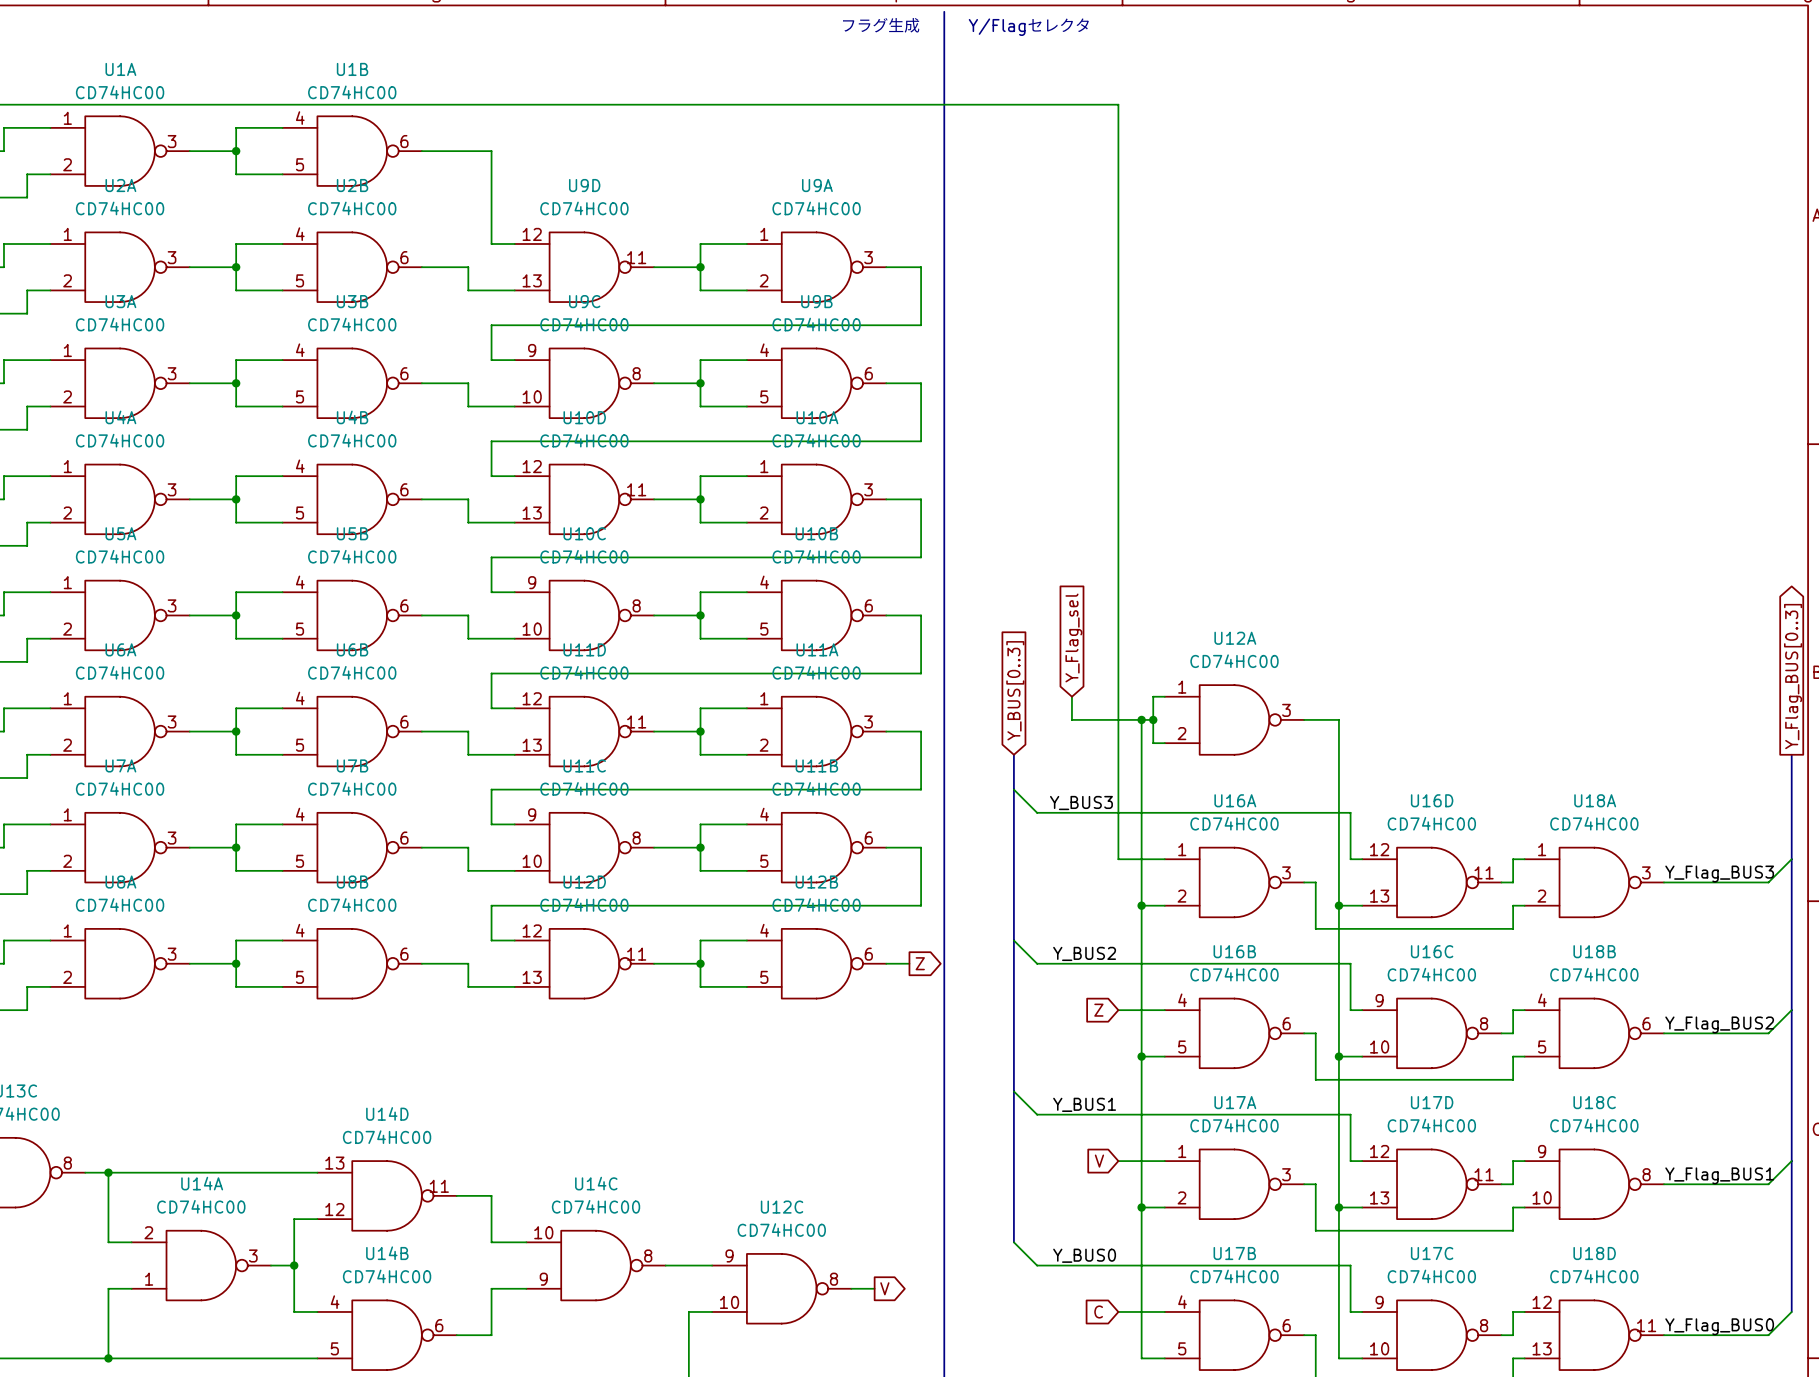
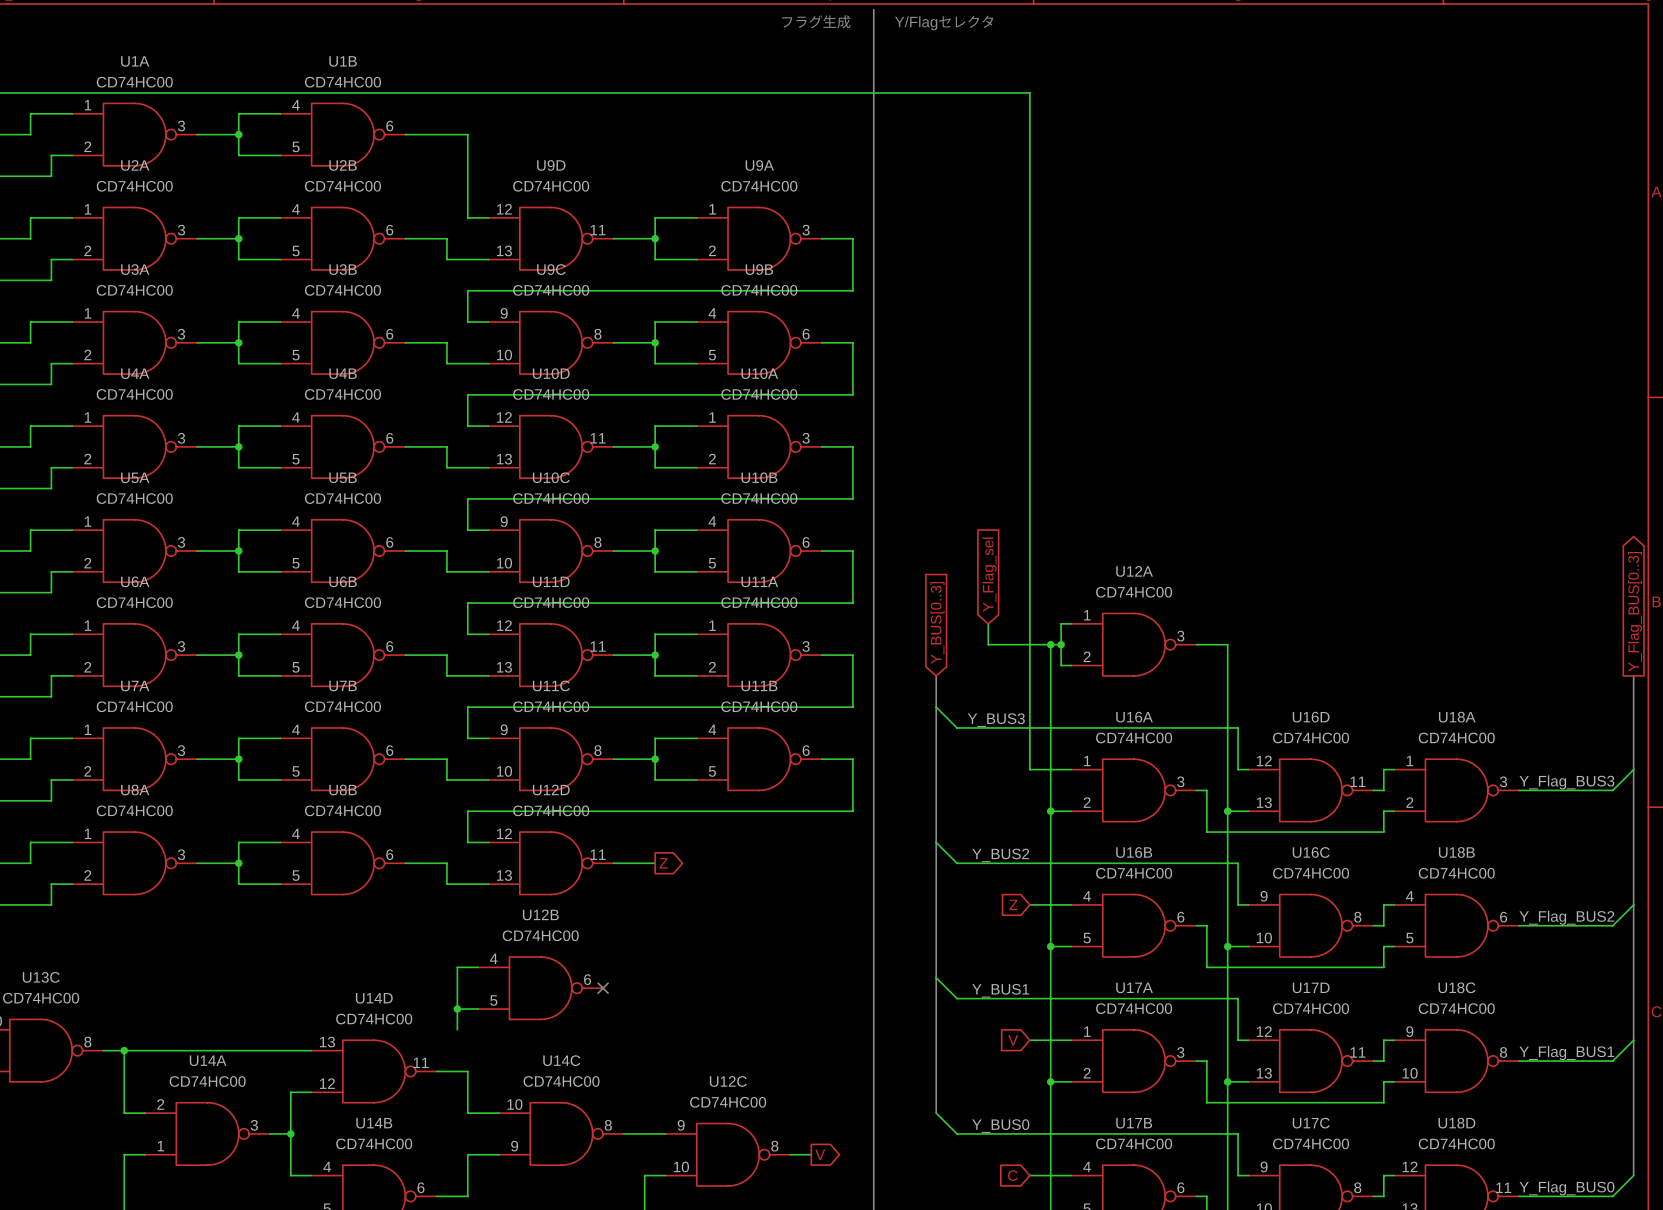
wire: (746, 940) (700, 940) (700, 986) (746, 986) -> none
junction: (700, 963) -> none
U12B position: (816, 963) -> (540, 988)
wire: (886, 963) (909, 963) -> none
global label position: Z (920, 963) -> Z (663, 863)
wire: none -> (478, 967) (457, 967) (457, 1029)
no-connect mark: none -> (603, 988)
wire: none -> (457, 1009) (478, 1009)
junction: none -> (457, 1009)

